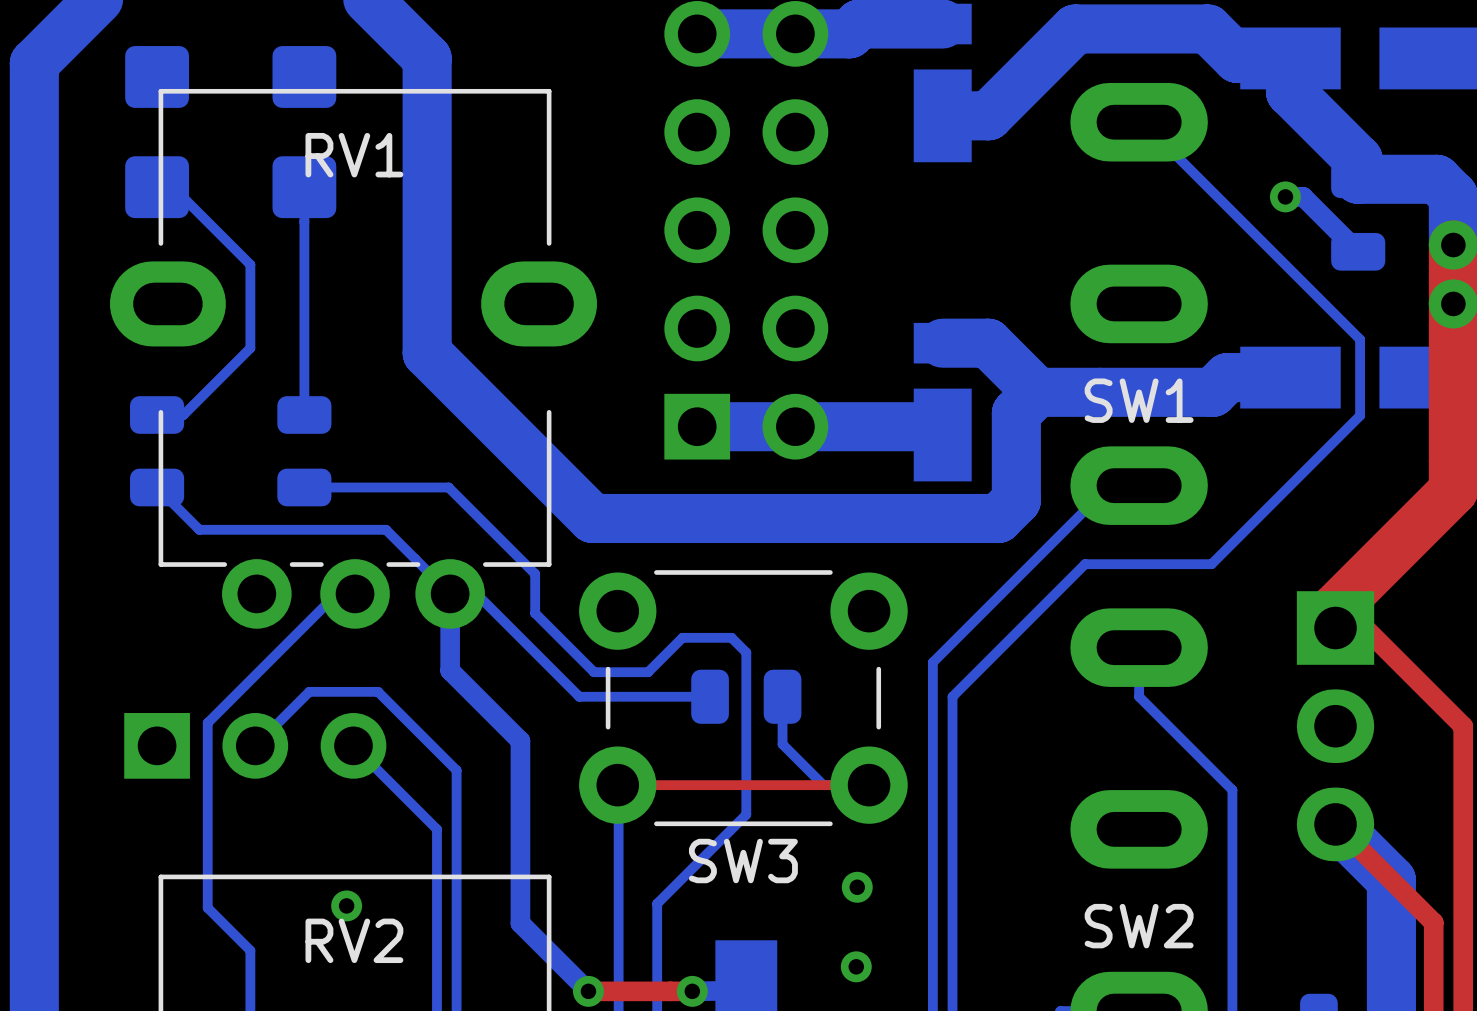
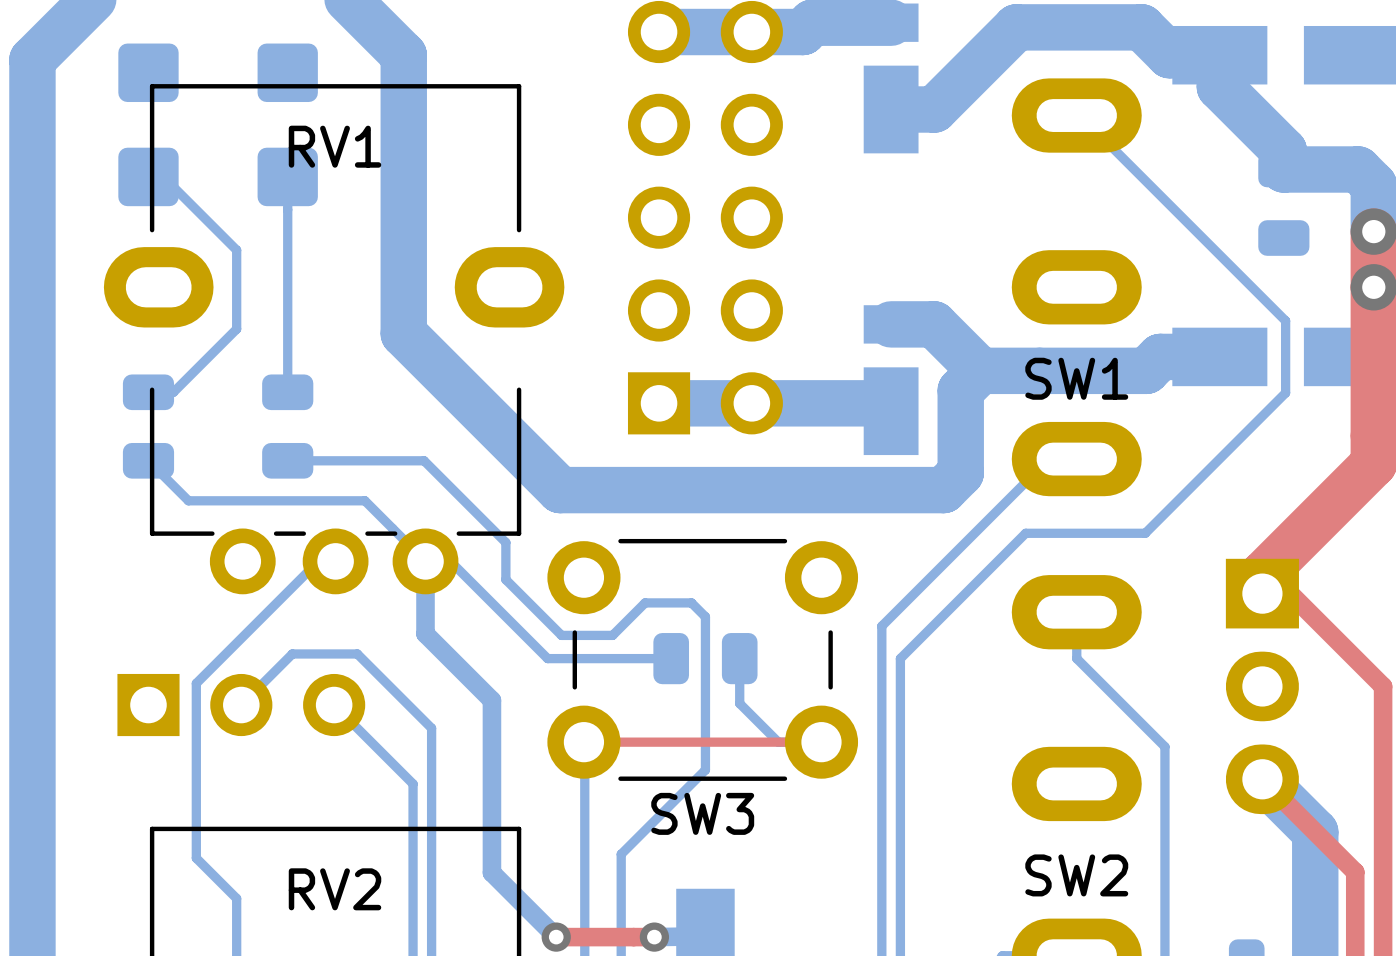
bottom track: (1285, 196) (1303, 196) (1358, 251) -> none
via: (1285, 196) -> none
via: (857, 887) -> none
via: (346, 905) -> none
via: (856, 966) -> none

